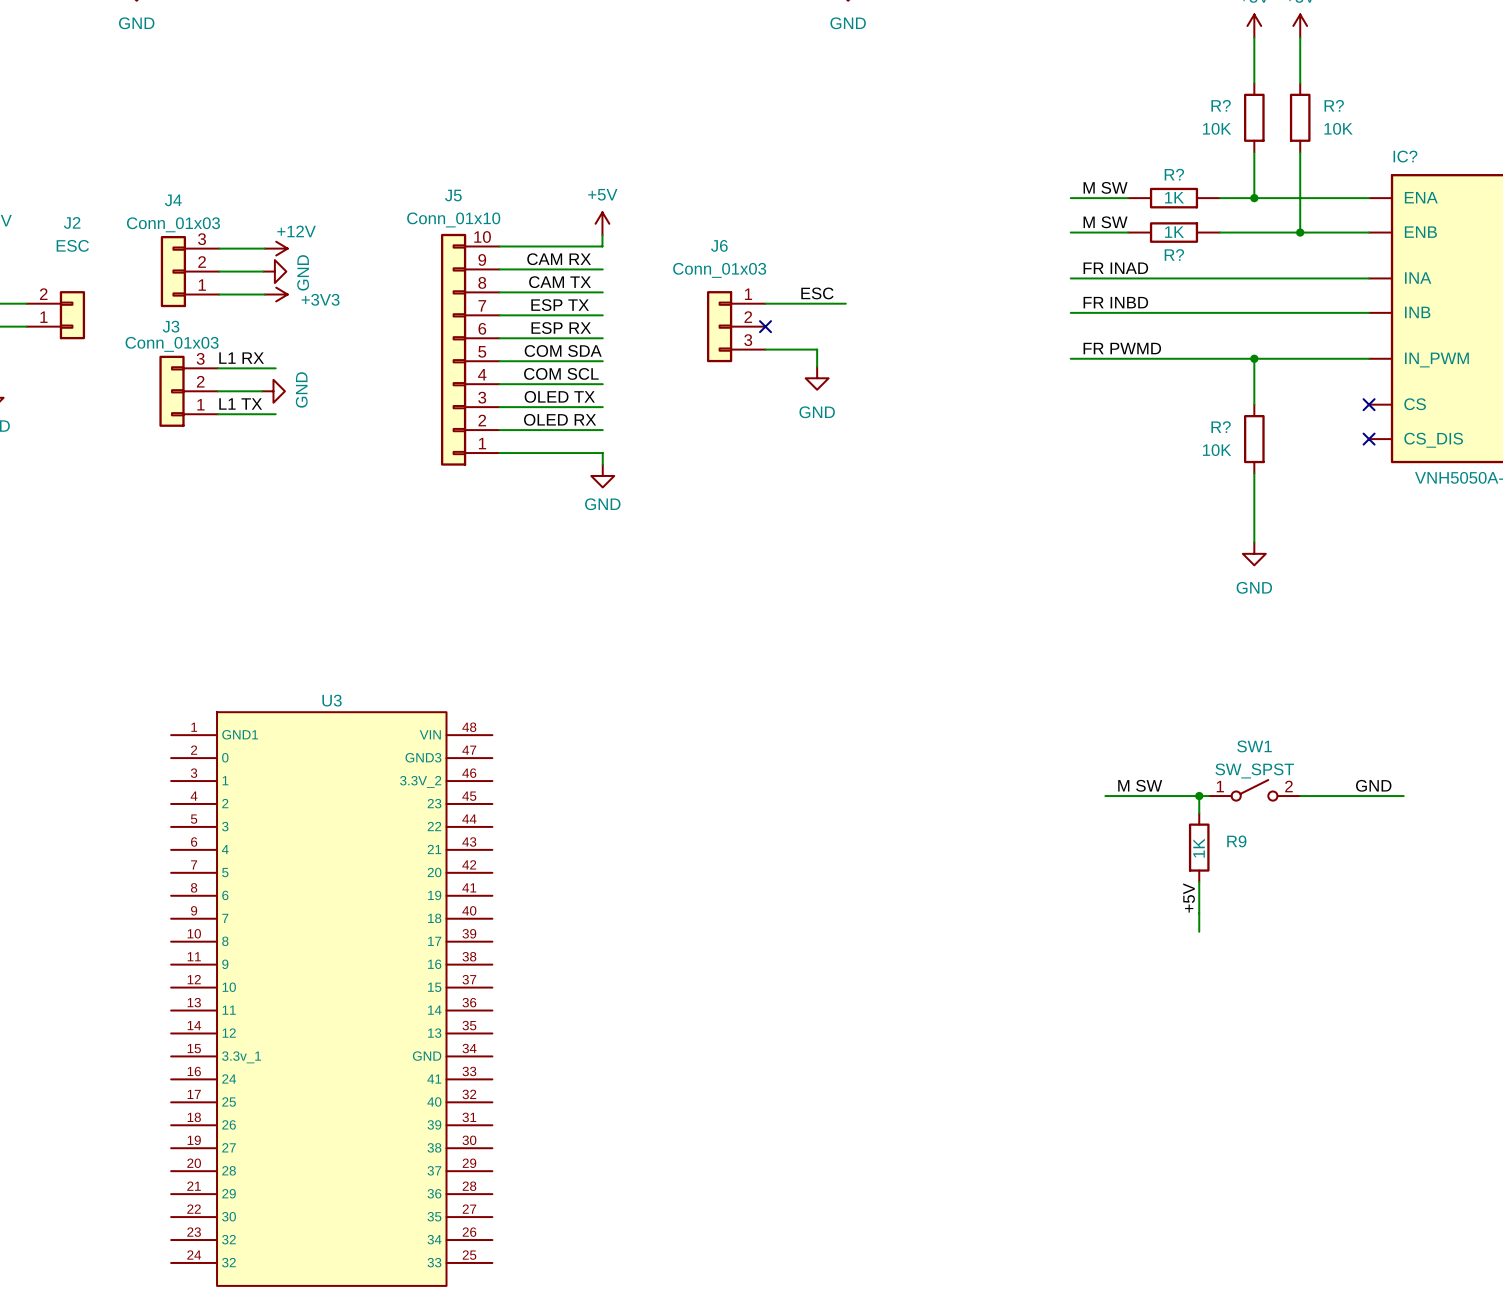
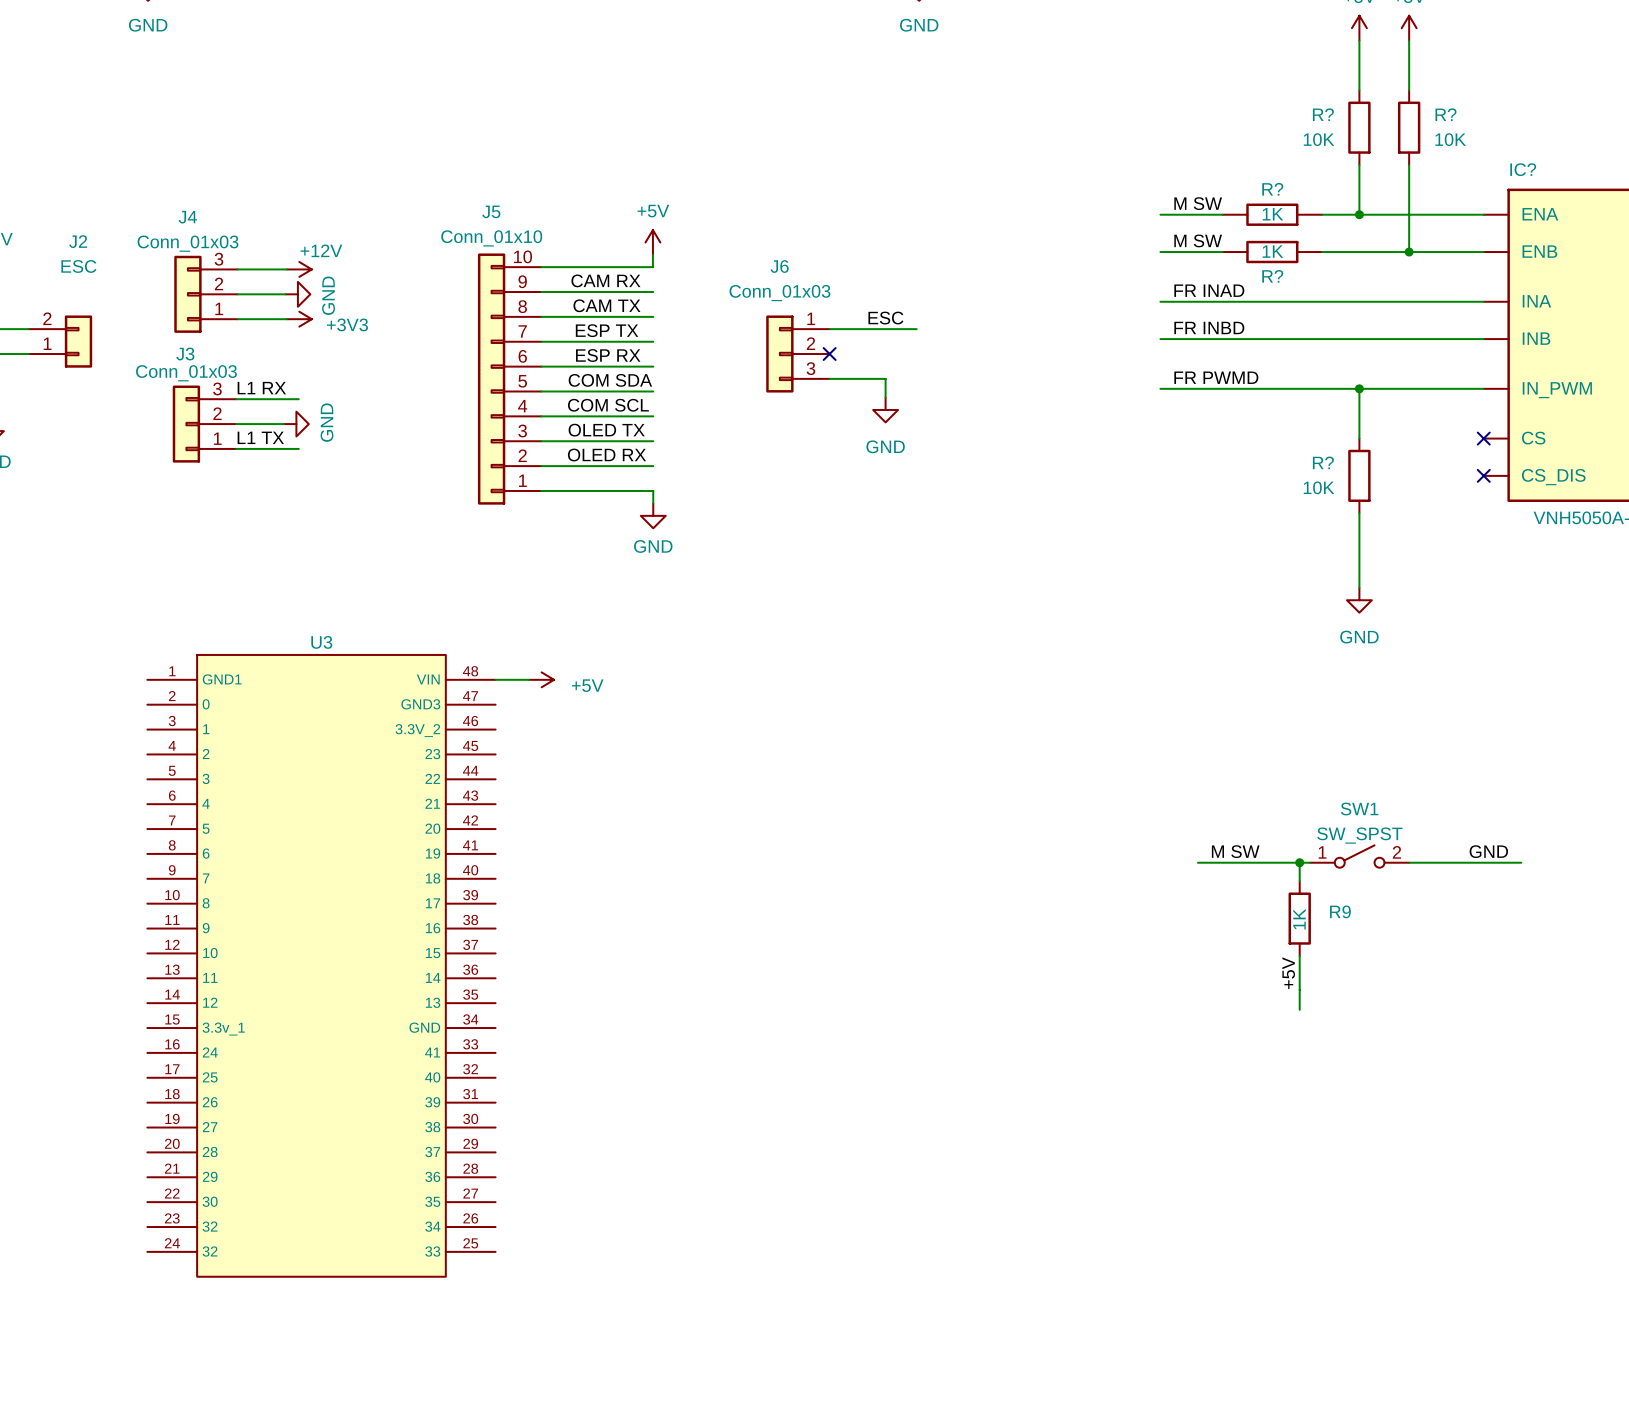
wire: none -> (495, 679) (529, 679)
power symbol: none -> +5V (541, 679)
U3 position: (331, 999) -> (321, 965)

